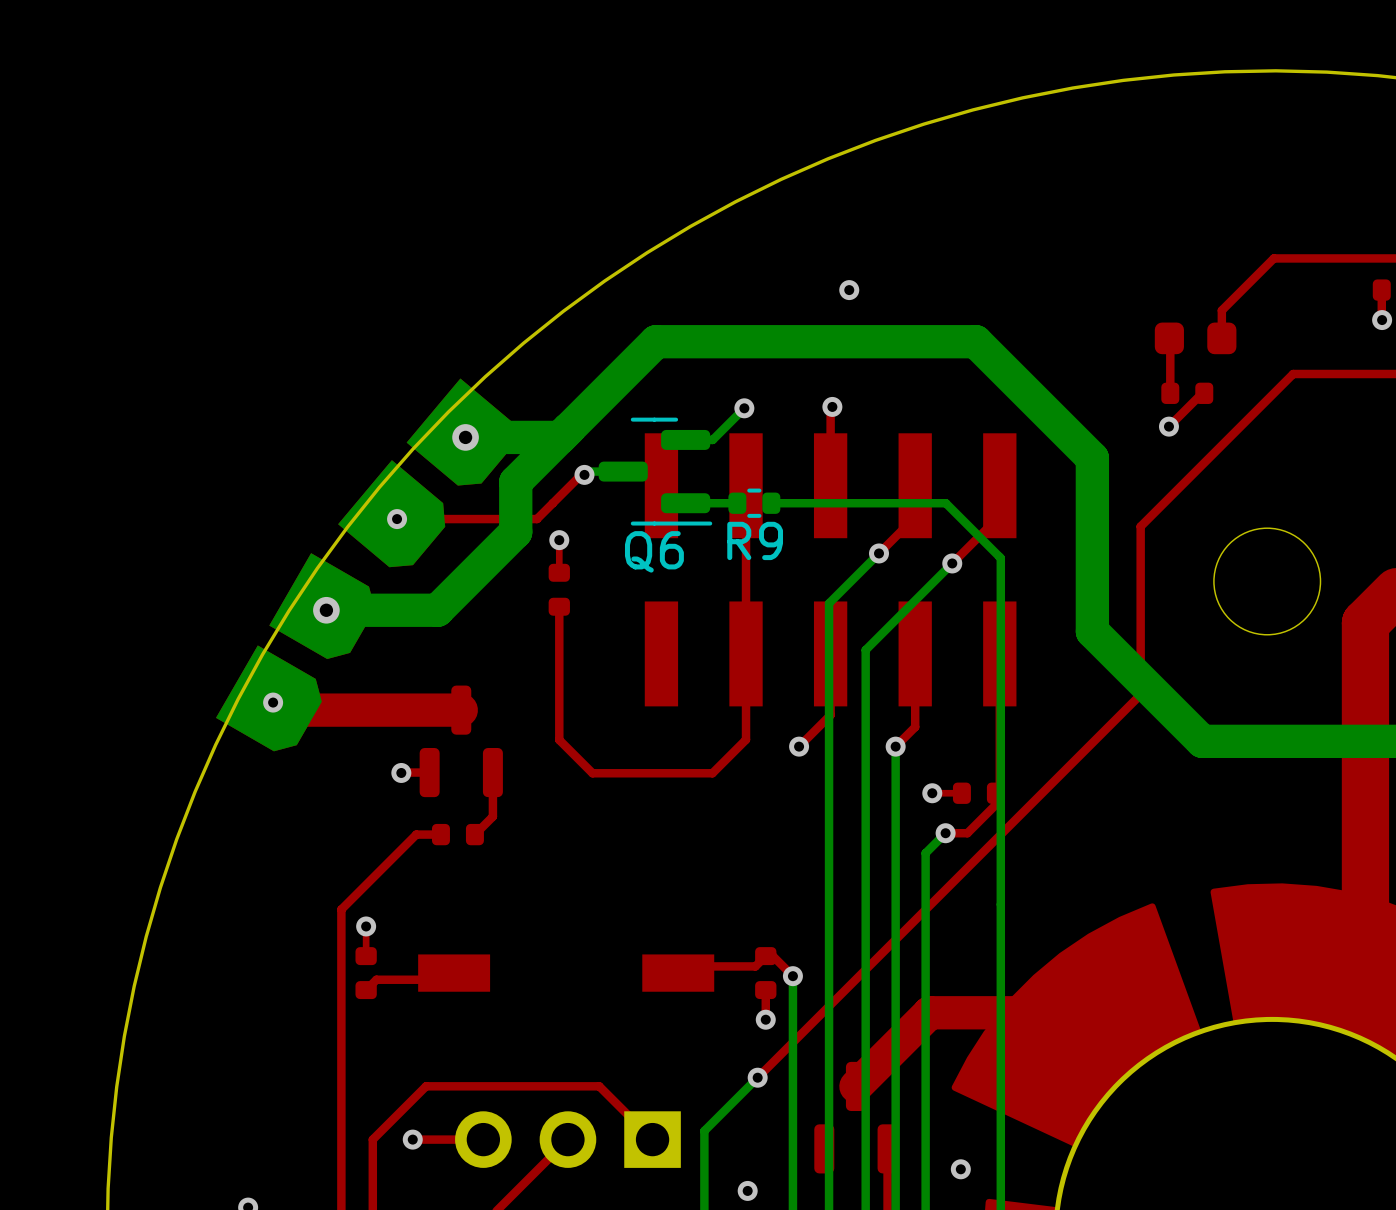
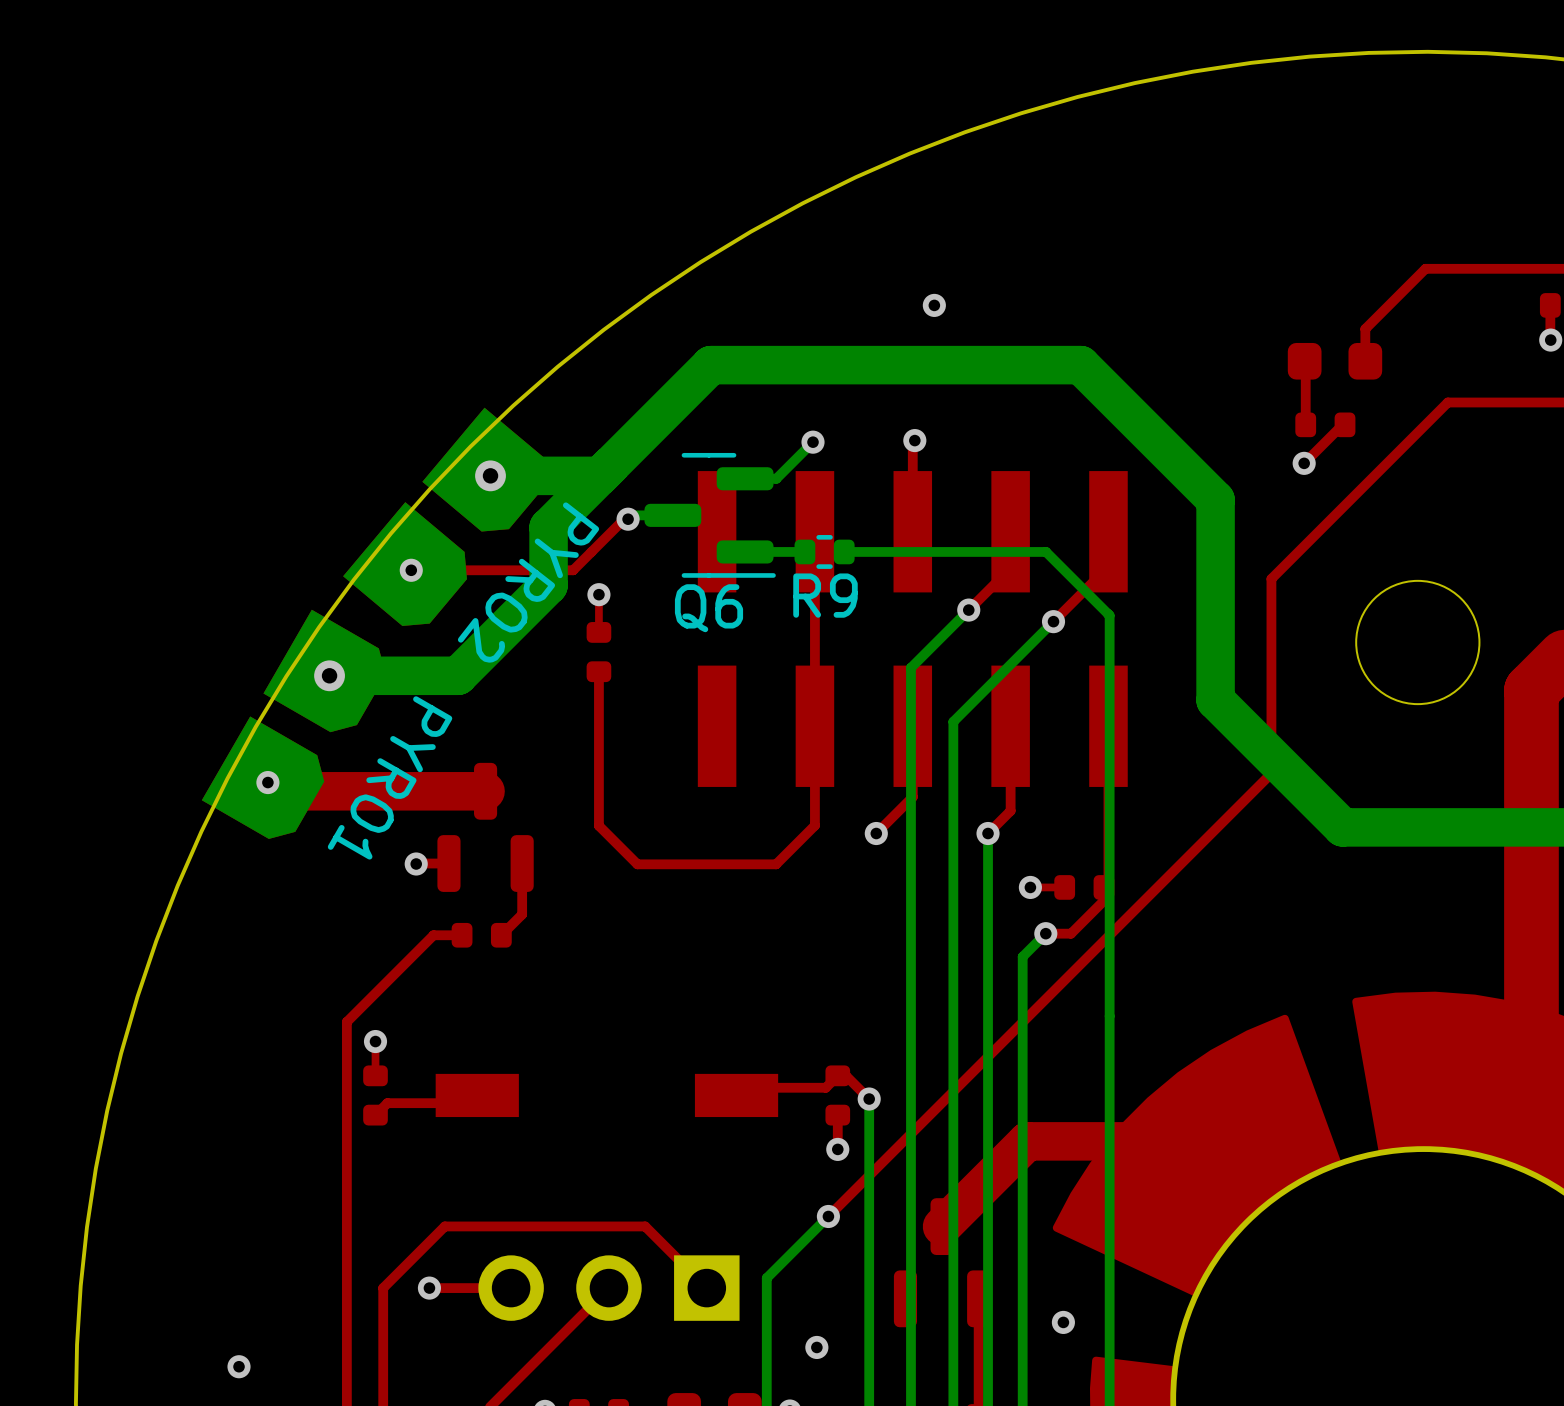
text: none -> PYRO2 (528, 582)
text: none -> PYRO1 (390, 777)

